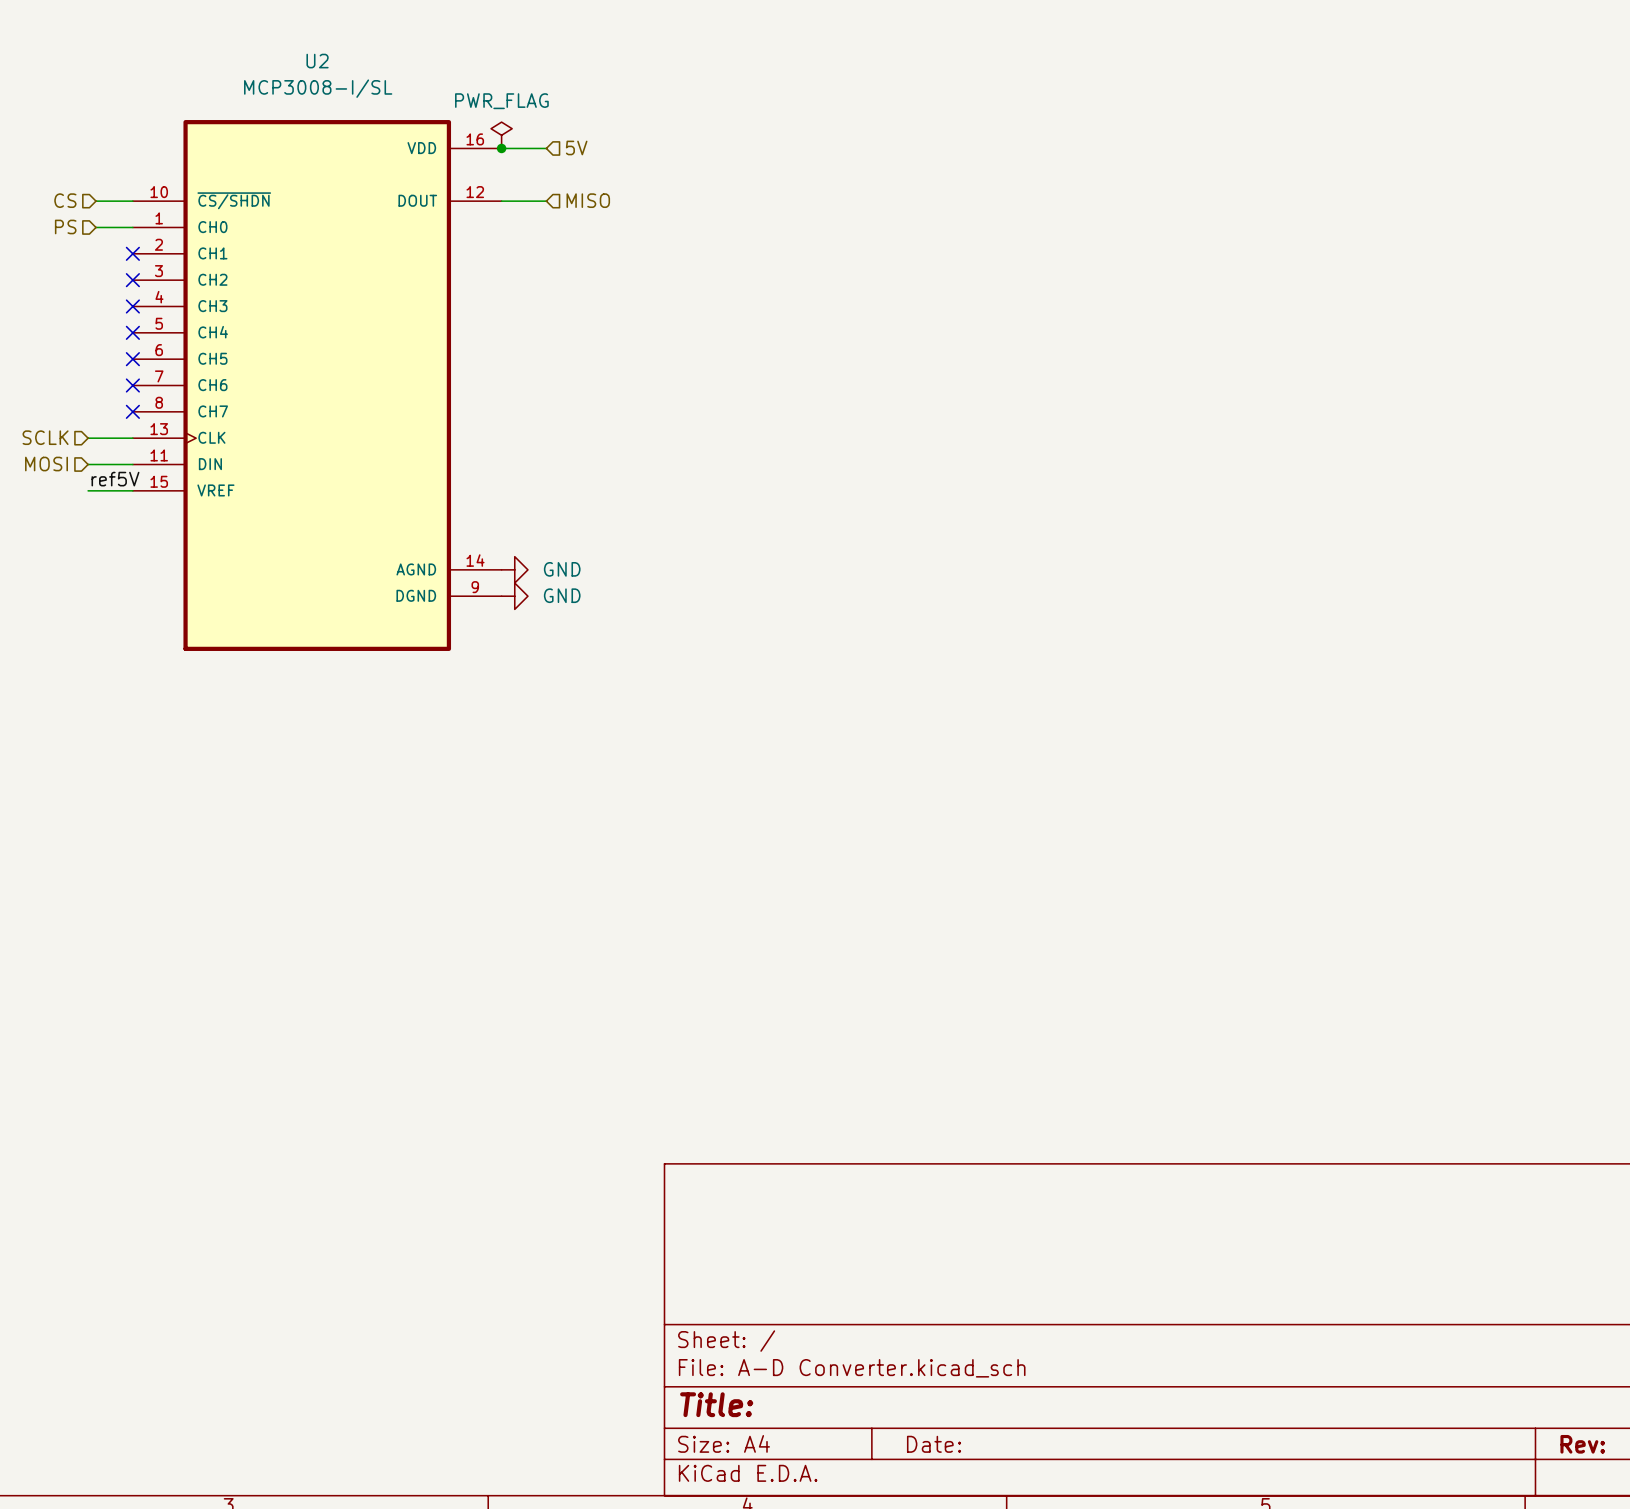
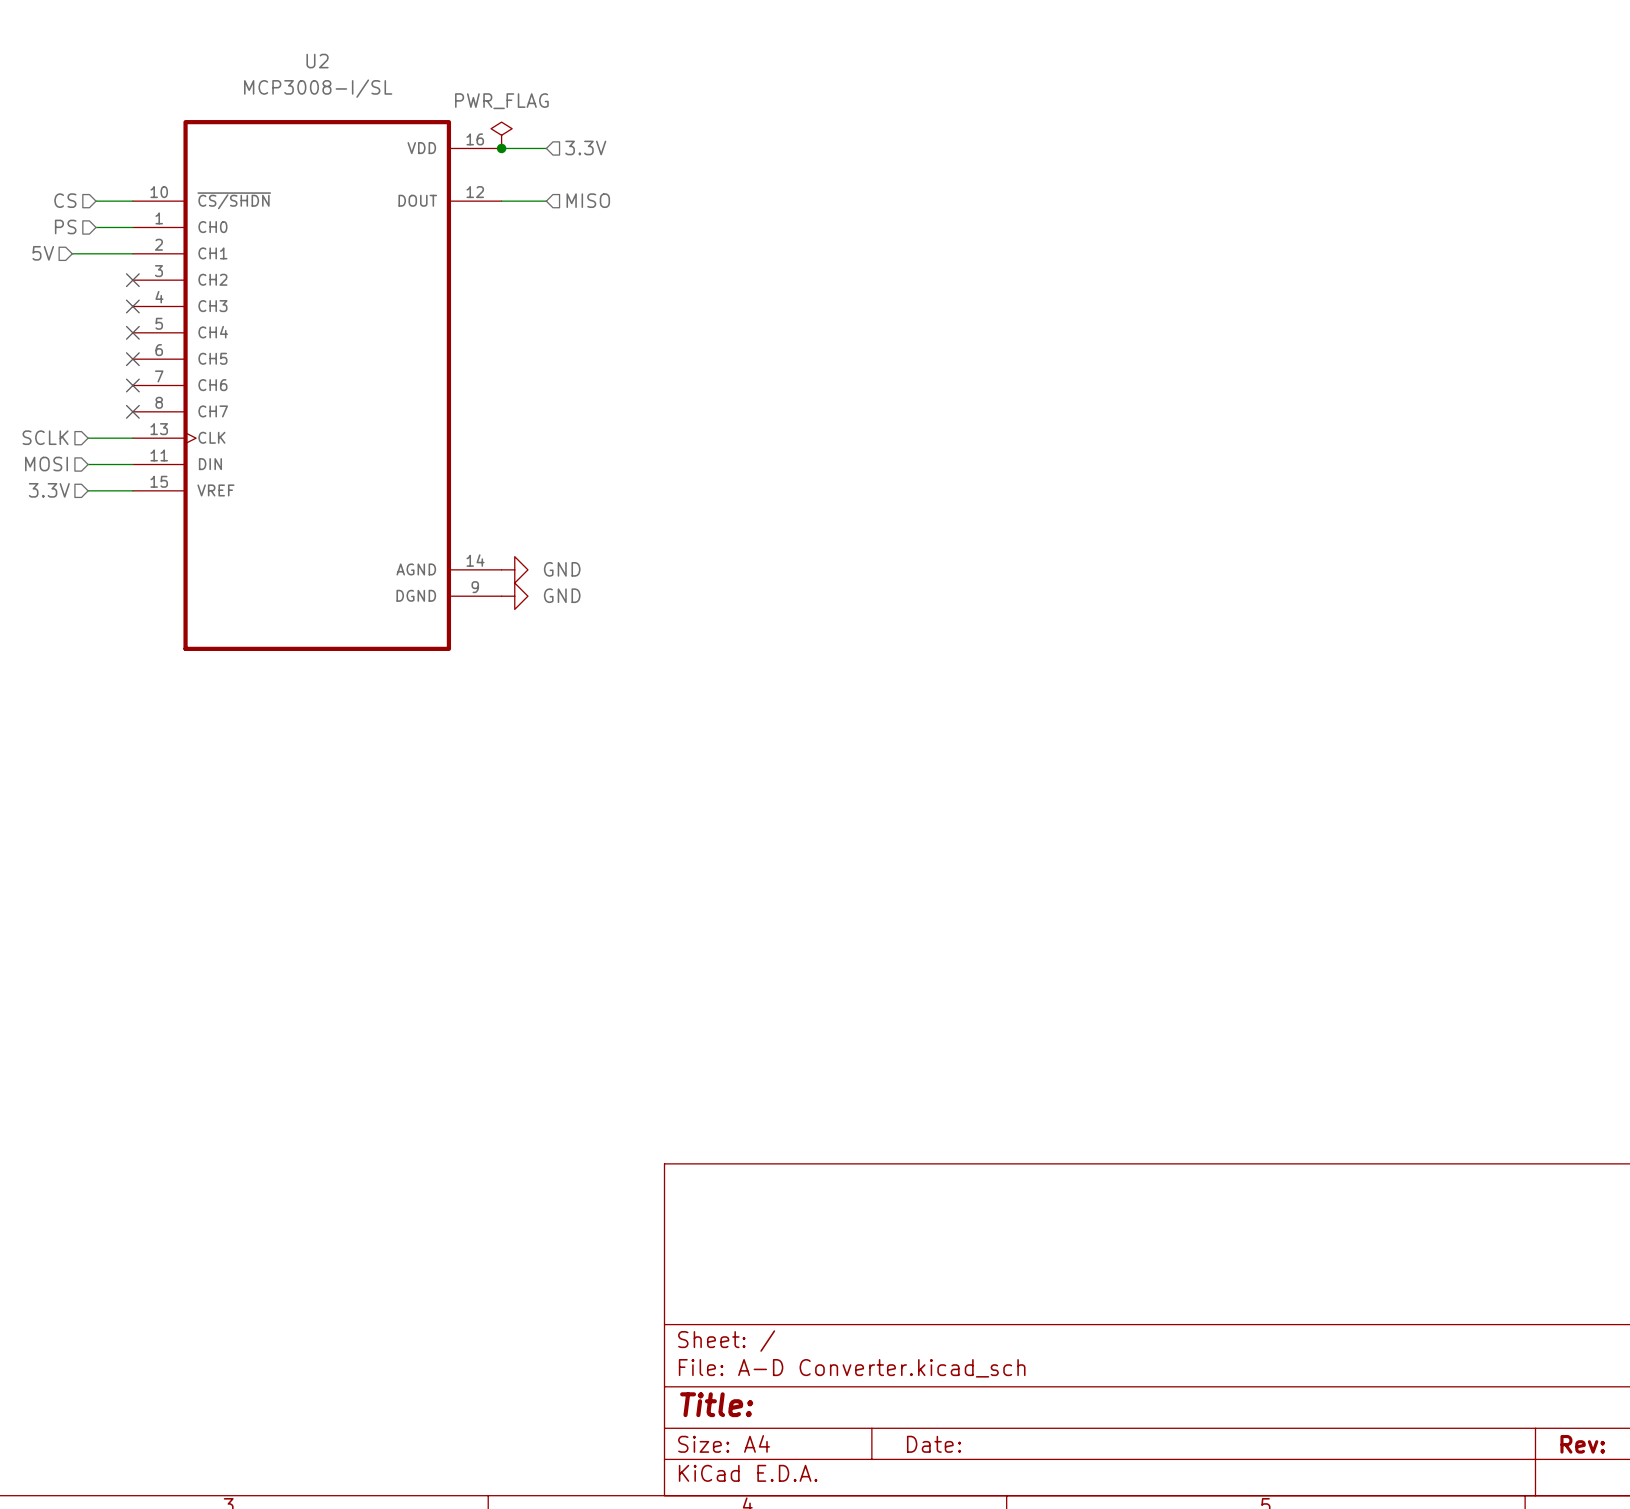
hierarchical label: 5V (576, 147) -> 3.3V (585, 147)
hierarchical label: none -> 5V (43, 253)
wire: none -> (72, 253) (132, 253)
no-connect mark: (132, 253) -> none
label: ref5V (115, 479) -> none
hierarchical label: none -> 3.3V (49, 490)

